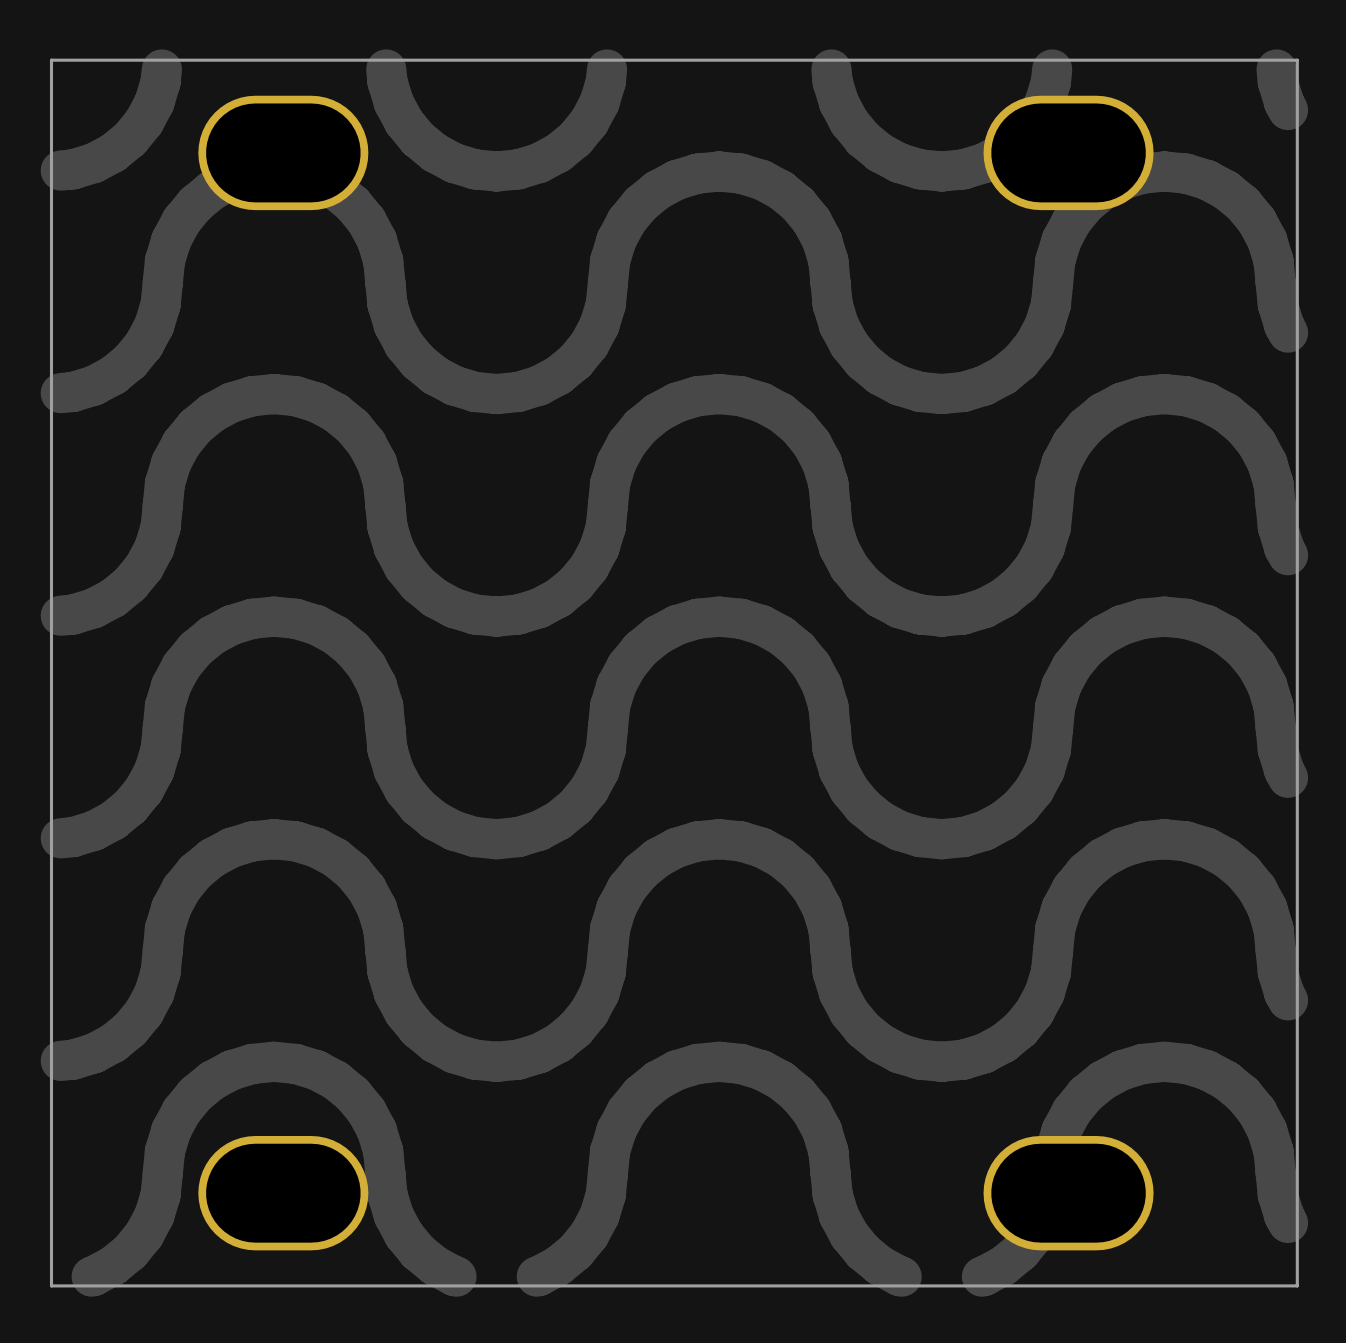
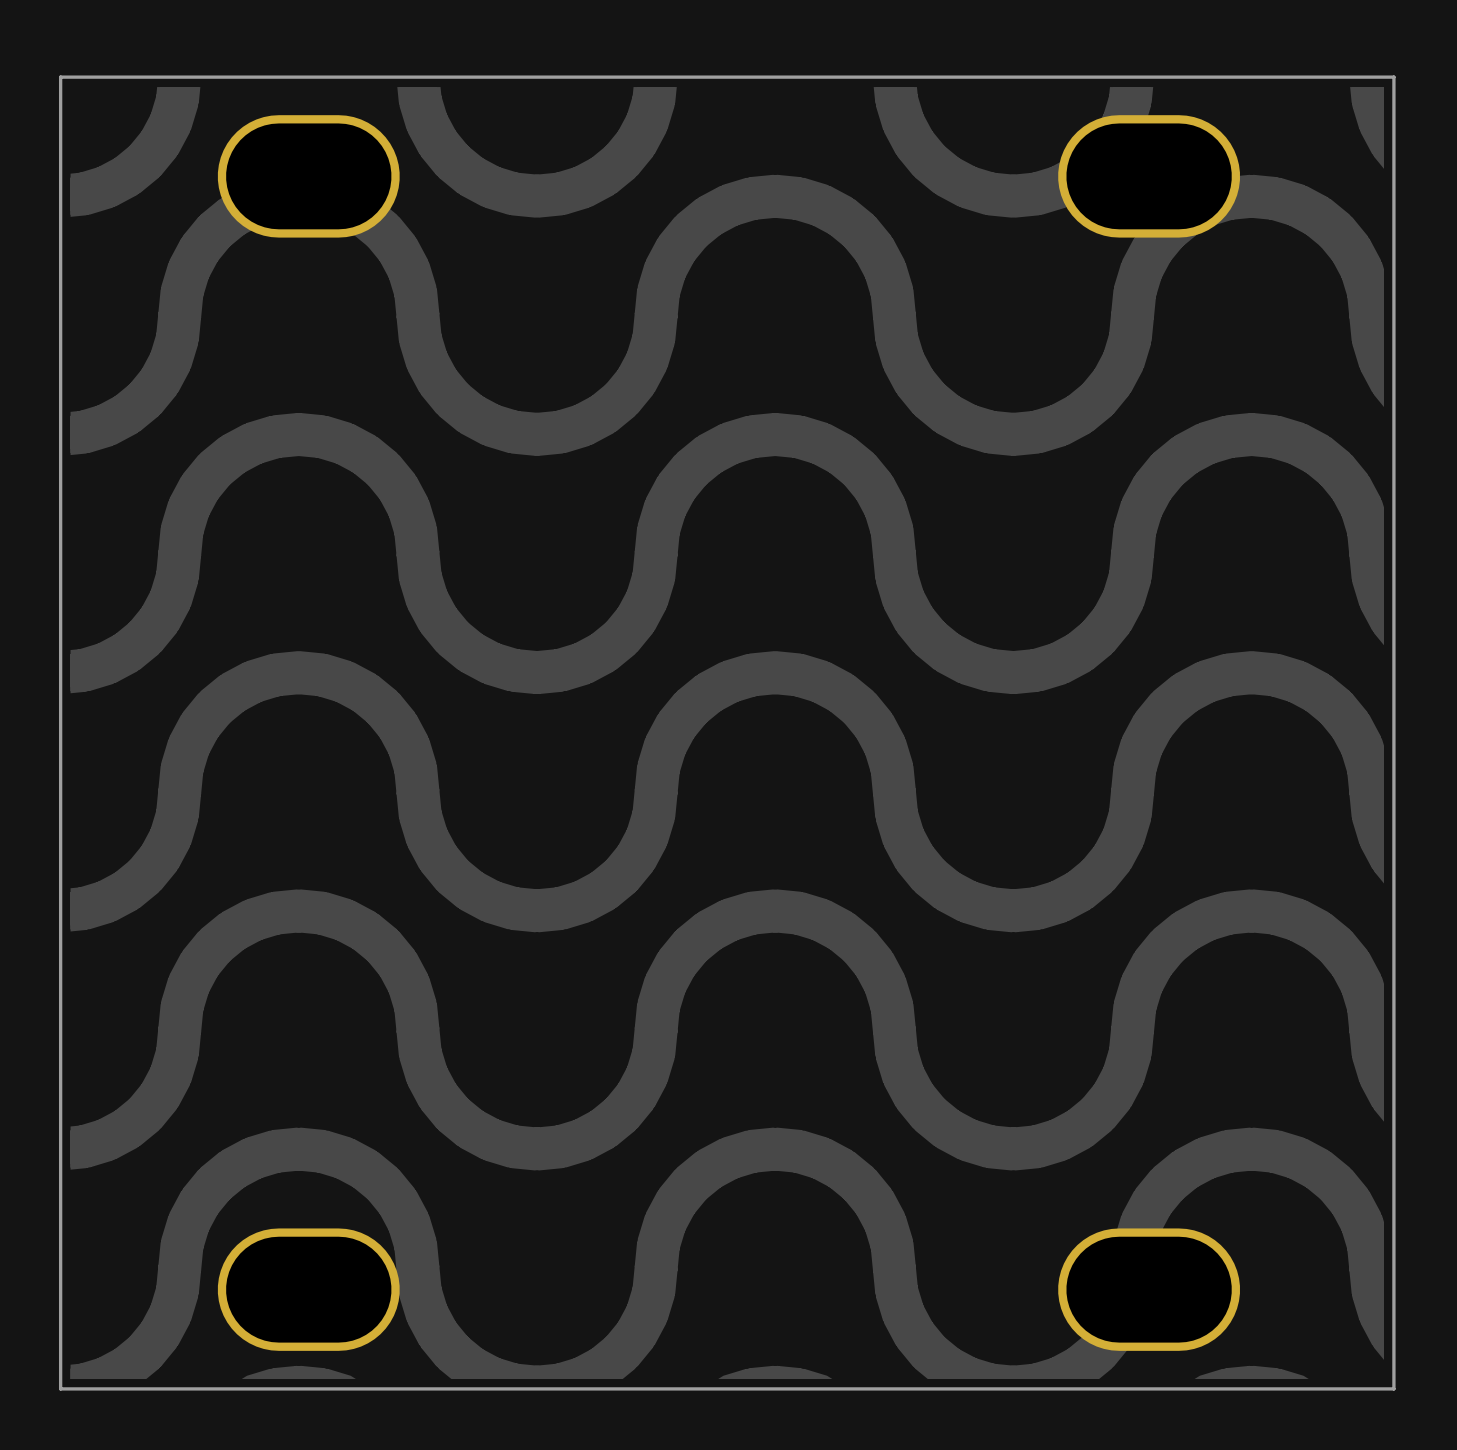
drawing: none -> [70, 87, 1385, 1379]
track: (161, 69) (160, 81) (154, 102) (144, 122) (130, 138) (113, 152) (94, 163) (73, 169) (60, 170) -> none
track: (386, 69) (387, 81) (393, 102) (404, 122) (417, 138) (434, 152) (454, 163) (474, 169) (496, 171) (518, 169) (539, 163) (558, 152) (575, 138) (589, 122) (599, 102) (605, 81) (607, 69) -> none
track: (831, 69) (832, 81) (838, 102) (849, 122) (863, 138) (879, 152) (899, 163) (920, 169) (941, 171) (963, 169) (984, 163) (1003, 152) (1020, 138) (1034, 122) (1044, 102) (1050, 81) (1052, 69) -> none
track: (1276, 69) (1277, 81) (1288, 110) -> none
track: (1288, 332) (1277, 304) (1273, 261) (1267, 240) (1256, 220) (1243, 204) (1226, 190) (1206, 179) (1186, 173) (1164, 171) (1142, 173) (1121, 179) (1102, 190) (1085, 204) (1071, 220) (1061, 240) (1055, 261) (1050, 304) (1044, 325) (1034, 344) (1020, 361) (1003, 375) (984, 385) (963, 391) (941, 394) (920, 391) (899, 385) (879, 375) (863, 361) (849, 344) (838, 325) (832, 304) (828, 261) (822, 240) (811, 220) (797, 204) (781, 190) (761, 179) (740, 173) (719, 171) (697, 173) (676, 179) (657, 190) (640, 204) (626, 220) (616, 240) (610, 261) (605, 304) (599, 325) (589, 344) (575, 361) (558, 375) (539, 385) (518, 391) (496, 394) (474, 391) (454, 385) (434, 375) (417, 361) (404, 344) (393, 325) (387, 304) (383, 261) (376, 240) (366, 220) (352, 204) (335, 190) (316, 179) (295, 173) (274, 171) (252, 173) (231, 179) (212, 190) (195, 204) (181, 220) (171, 240) (164, 261) (160, 304) (154, 325) (144, 344) (130, 361) (113, 375) (94, 385) (73, 391) (60, 393) -> none
track: (1288, 555) (1277, 527) (1273, 483) (1267, 462) (1256, 443) (1243, 426) (1226, 412) (1206, 402) (1186, 396) (1164, 394) (1142, 396) (1121, 402) (1102, 412) (1085, 426) (1071, 443) (1061, 462) (1055, 483) (1050, 527) (1044, 547) (1034, 567) (1020, 584) (1003, 597) (984, 608) (963, 614) (941, 616) (920, 614) (899, 608) (879, 597) (863, 584) (849, 567) (838, 547) (832, 527) (828, 483) (822, 462) (811, 443) (797, 426) (781, 412) (761, 402) (740, 396) (719, 394) (697, 396) (676, 402) (657, 412) (640, 426) (626, 443) (616, 462) (610, 483) (605, 527) (599, 547) (589, 567) (575, 584) (558, 597) (539, 608) (518, 614) (496, 616) (474, 614) (454, 608) (434, 597) (417, 584) (404, 567) (393, 547) (387, 527) (383, 483) (376, 462) (366, 443) (352, 426) (335, 412) (316, 402) (295, 396) (274, 394) (252, 396) (231, 402) (212, 412) (195, 426) (181, 443) (171, 462) (164, 483) (160, 527) (154, 547) (144, 567) (130, 584) (113, 597) (94, 608) (73, 614) (60, 615) -> none
track: (1288, 777) (1277, 749) (1273, 706) (1267, 685) (1256, 666) (1243, 649) (1226, 635) (1206, 625) (1186, 618) (1164, 616) (1142, 618) (1121, 625) (1102, 635) (1085, 649) (1071, 666) (1061, 685) (1055, 706) (1050, 749) (1044, 770) (1034, 789) (1020, 806) (1003, 820) (984, 830) (963, 837) (941, 839) (920, 837) (899, 830) (879, 820) (863, 806) (849, 789) (838, 770) (832, 749) (828, 706) (822, 685) (811, 666) (797, 649) (781, 635) (761, 625) (740, 618) (719, 616) (697, 618) (676, 625) (657, 635) (640, 649) (626, 666) (616, 685) (610, 706) (605, 749) (599, 770) (589, 789) (575, 806) (558, 820) (539, 830) (518, 837) (496, 839) (474, 837) (454, 830) (434, 820) (417, 806) (404, 789) (393, 770) (387, 749) (383, 706) (376, 685) (366, 666) (352, 649) (335, 635) (316, 625) (295, 618) (274, 616) (252, 618) (231, 625) (212, 635) (195, 649) (181, 666) (171, 685) (164, 706) (160, 749) (154, 770) (144, 789) (130, 806) (113, 820) (94, 830) (73, 837) (60, 838) -> none
track: (1288, 1000) (1277, 972) (1273, 928) (1267, 907) (1256, 888) (1243, 871) (1226, 857) (1206, 847) (1186, 841) (1164, 839) (1142, 841) (1121, 847) (1102, 857) (1085, 871) (1071, 888) (1061, 907) (1055, 928) (1050, 972) (1044, 993) (1034, 1012) (1020, 1029) (1003, 1043) (984, 1053) (963, 1059) (941, 1061) (920, 1059) (899, 1053) (879, 1043) (863, 1029) (849, 1012) (838, 993) (832, 972) (828, 928) (822, 907) (811, 888) (797, 871) (781, 857) (761, 847) (740, 841) (719, 839) (697, 841) (676, 847) (657, 857) (640, 871) (626, 888) (616, 907) (610, 928) (605, 972) (599, 993) (589, 1012) (575, 1029) (558, 1043) (539, 1053) (518, 1059) (496, 1061) (474, 1059) (454, 1053) (434, 1043) (417, 1029) (404, 1012) (393, 993) (387, 972) (383, 928) (376, 907) (366, 888) (352, 871) (335, 857) (316, 847) (295, 841) (274, 839) (252, 841) (231, 847) (212, 857) (195, 871) (181, 888) (171, 907) (164, 928) (160, 972) (154, 993) (144, 1012) (130, 1029) (113, 1043) (94, 1053) (73, 1059) (60, 1060) -> none
track: (1288, 1222) (1277, 1194) (1273, 1151) (1267, 1130) (1256, 1111) (1243, 1094) (1226, 1080) (1206, 1070) (1186, 1063) (1164, 1061) (1142, 1063) (1121, 1070) (1102, 1080) (1085, 1094) (1071, 1111) (1061, 1130) (1055, 1151) (1050, 1194) (1044, 1215) (1034, 1234) (1020, 1251) (1003, 1265) (981, 1276) -> none
drawing: none -> [241, 1365, 356, 1379]
drawing: none -> [718, 1365, 833, 1379]
drawing: none -> [1194, 1365, 1309, 1379]
track: (91, 1276) (113, 1265) (130, 1251) (144, 1234) (154, 1215) (160, 1194) (164, 1151) (171, 1130) (181, 1111) (195, 1094) (212, 1080) (231, 1070) (252, 1063) (274, 1061) (295, 1063) (316, 1070) (335, 1080) (352, 1094) (366, 1111) (376, 1130) (383, 1151) (387, 1194) (393, 1215) (404, 1234) (417, 1251) (434, 1265) (456, 1276) -> none
track: (536, 1276) (558, 1265) (575, 1251) (589, 1234) (599, 1215) (605, 1194) (610, 1151) (616, 1130) (626, 1111) (640, 1094) (657, 1080) (676, 1070) (697, 1063) (719, 1061) (740, 1063) (761, 1070) (781, 1080) (797, 1094) (811, 1111) (822, 1130) (828, 1151) (832, 1194) (838, 1215) (849, 1234) (863, 1251) (879, 1265) (901, 1276) -> none

